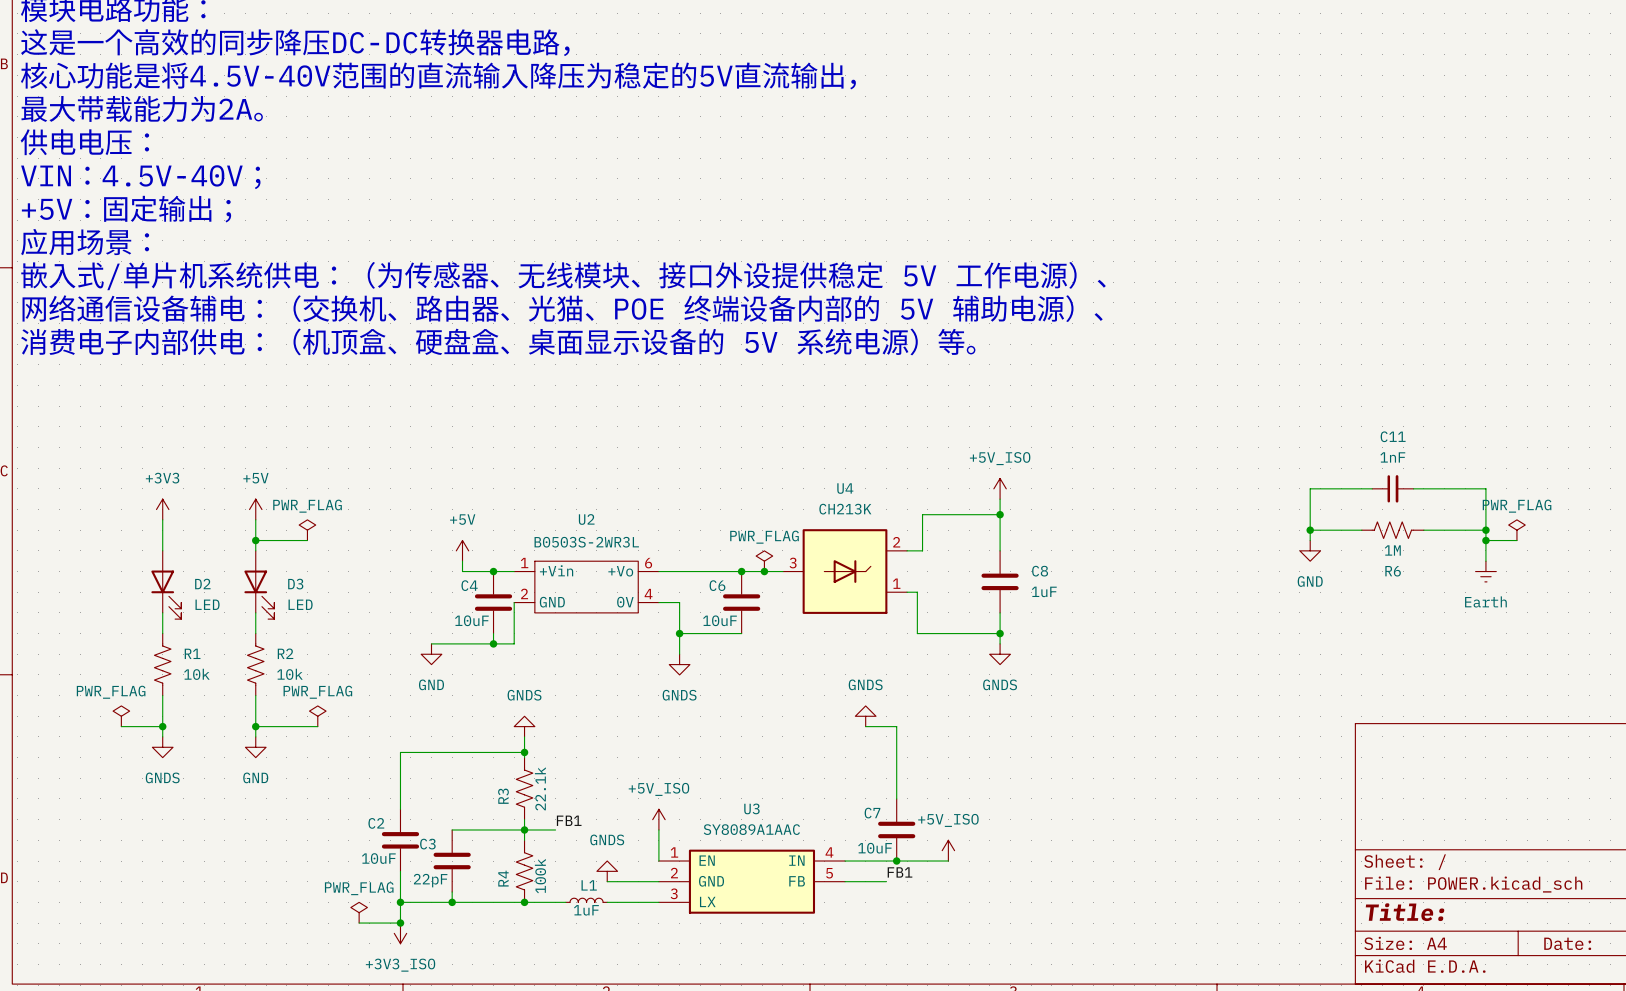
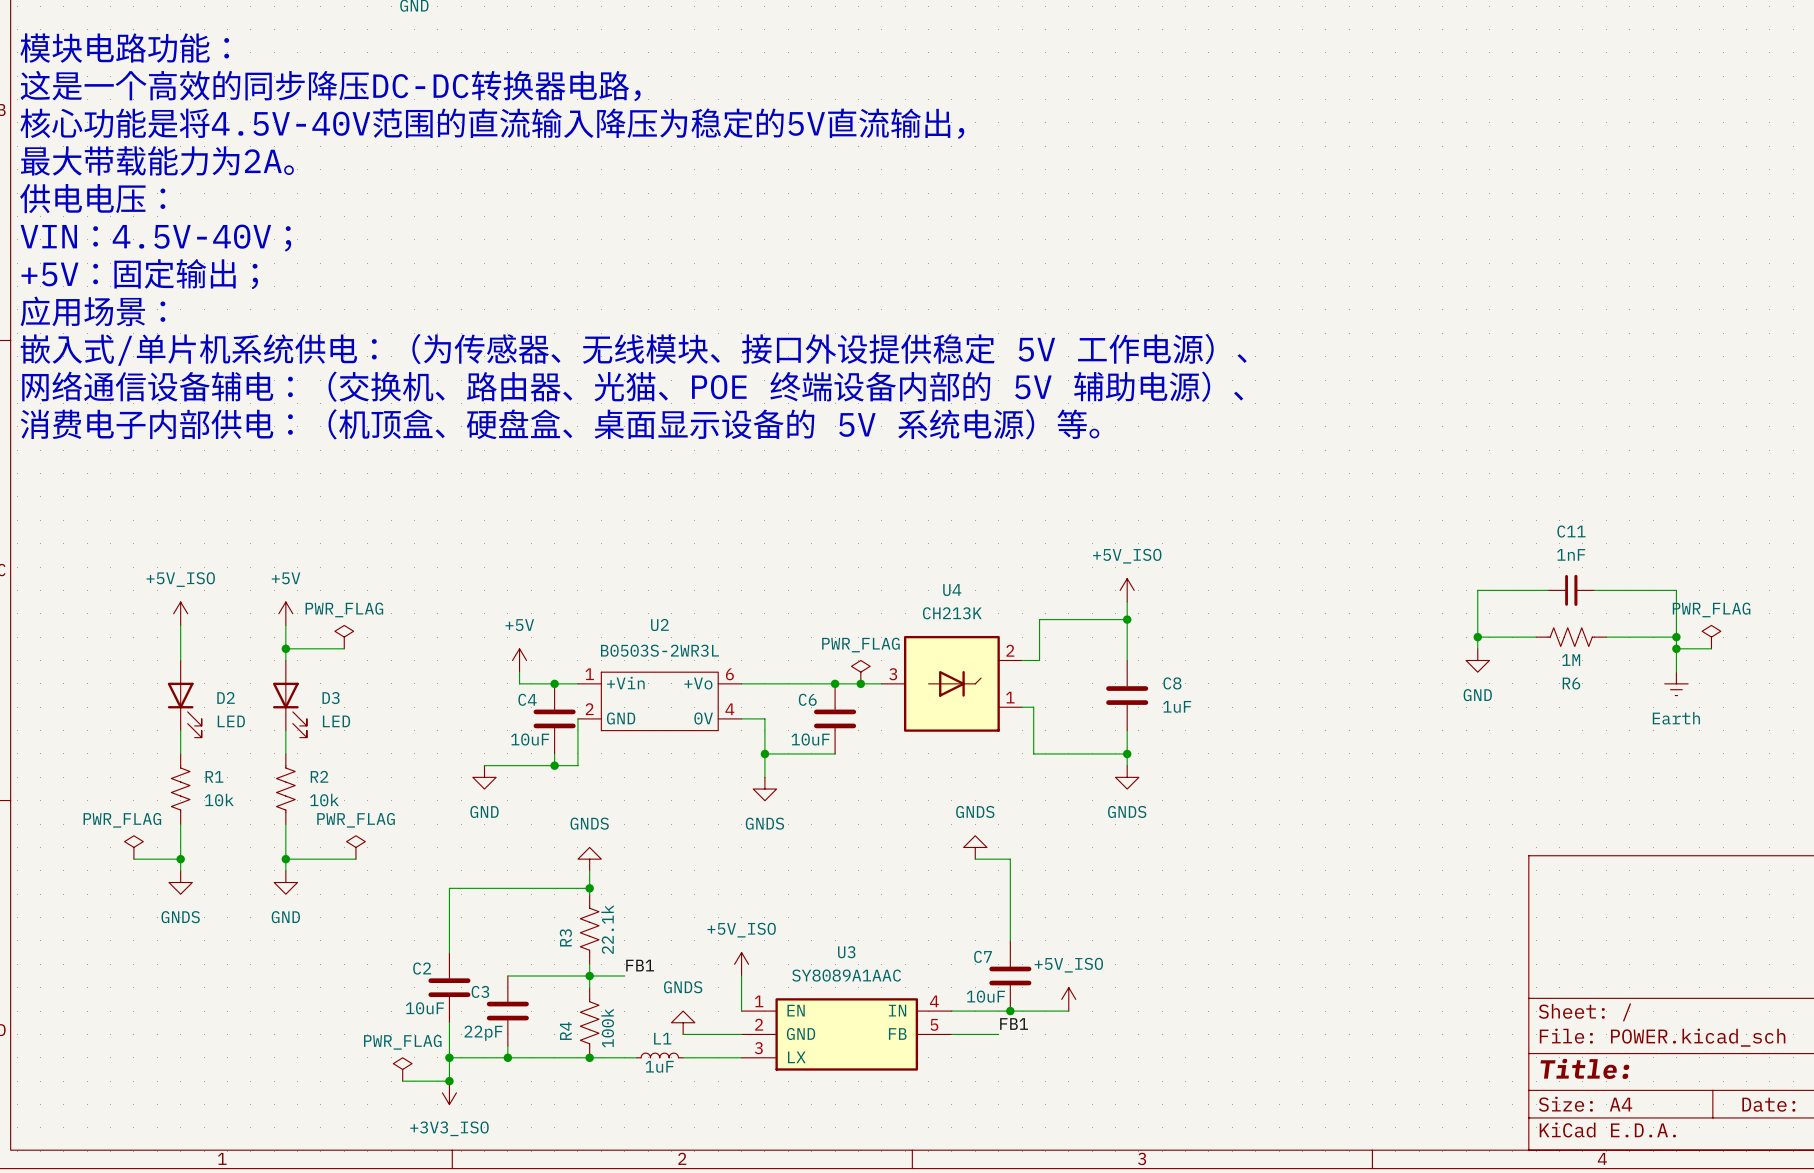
power symbol: +3V3 (162, 509) -> +5V_ISO (180, 613)

